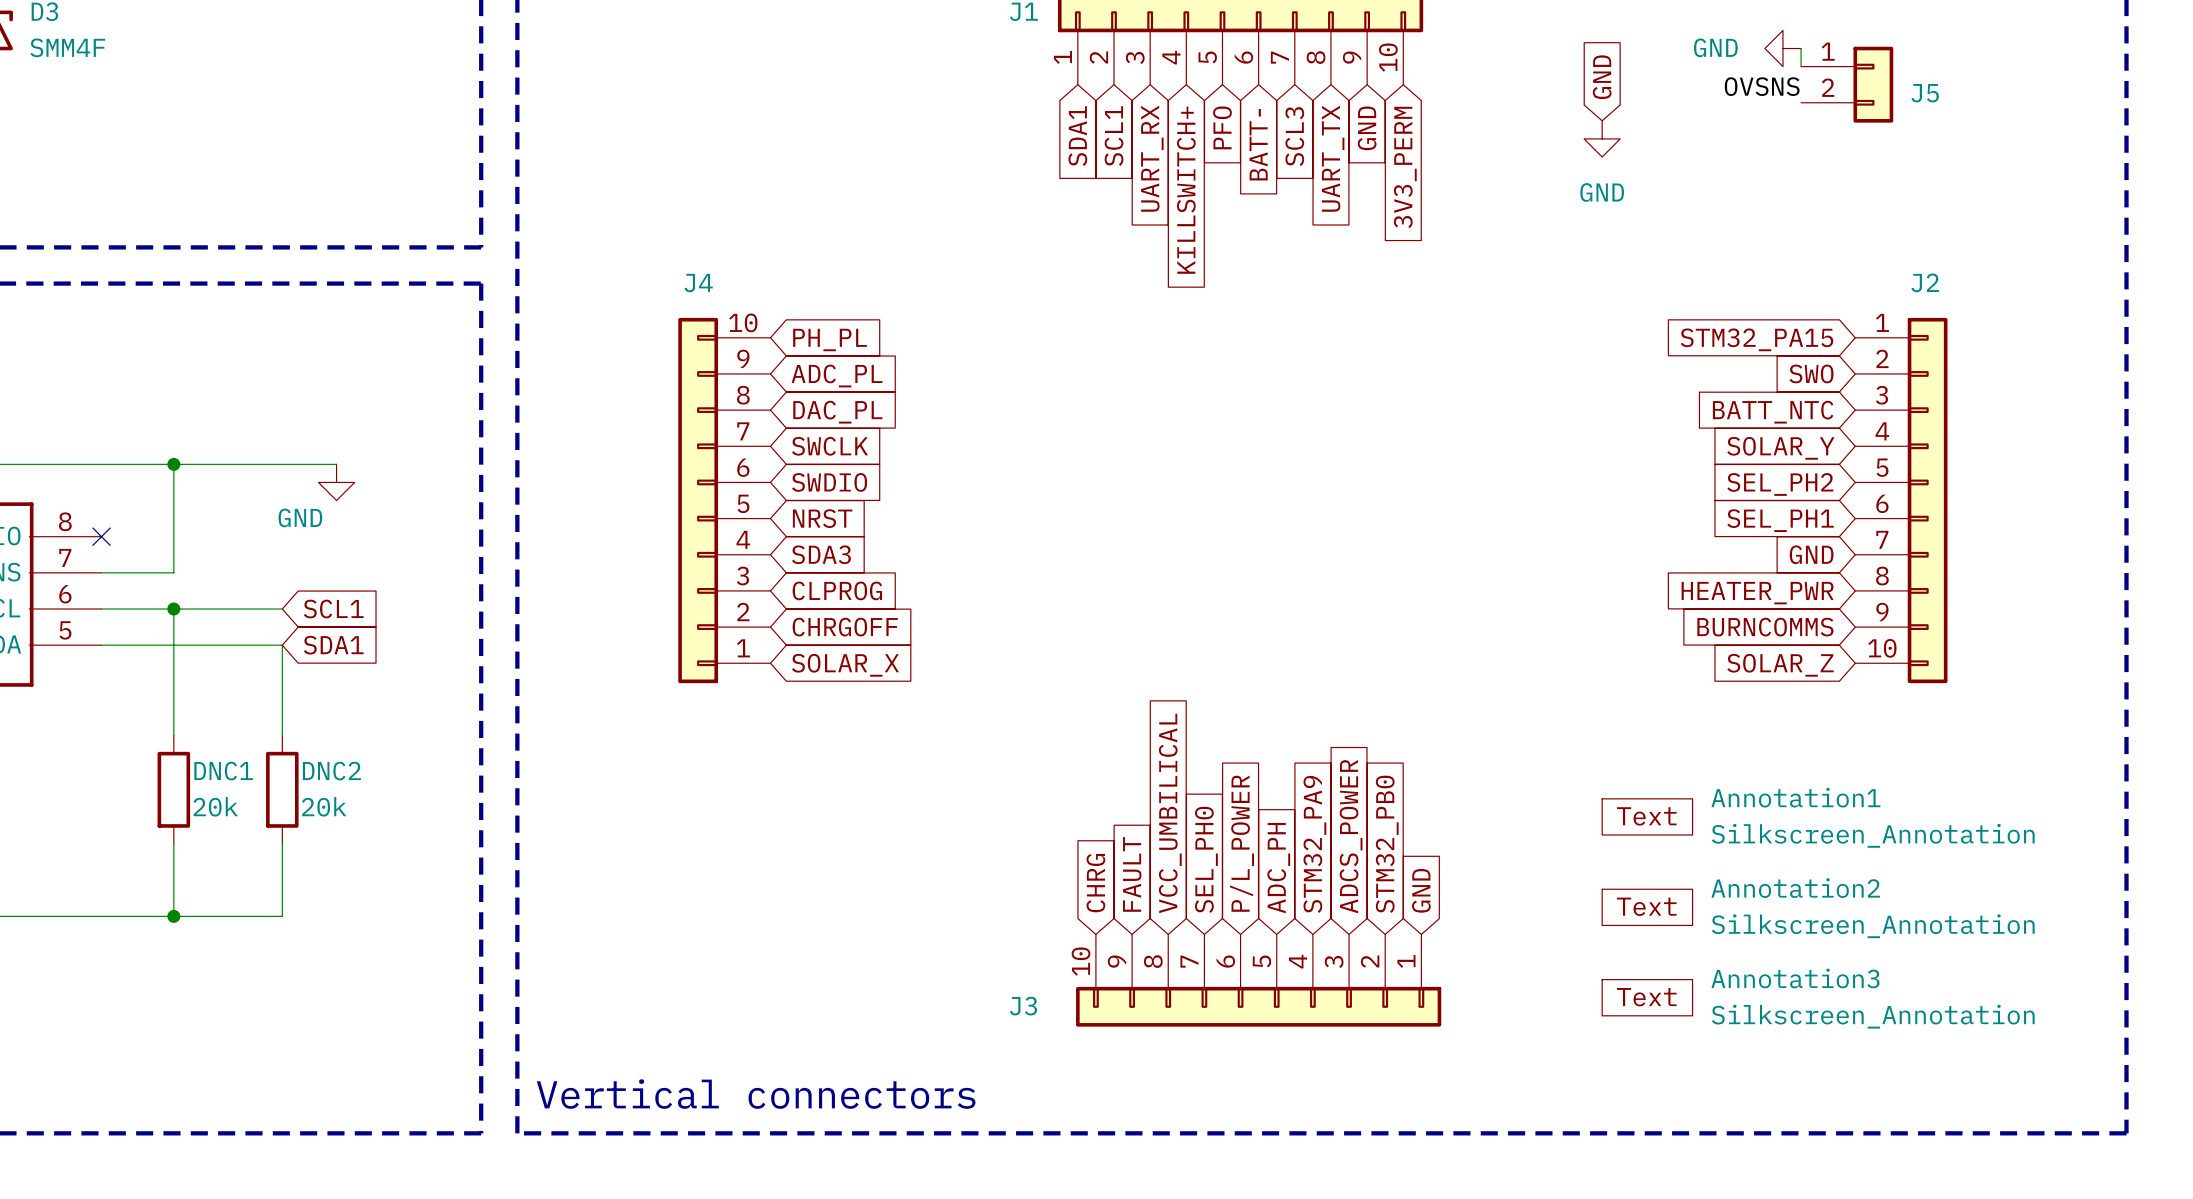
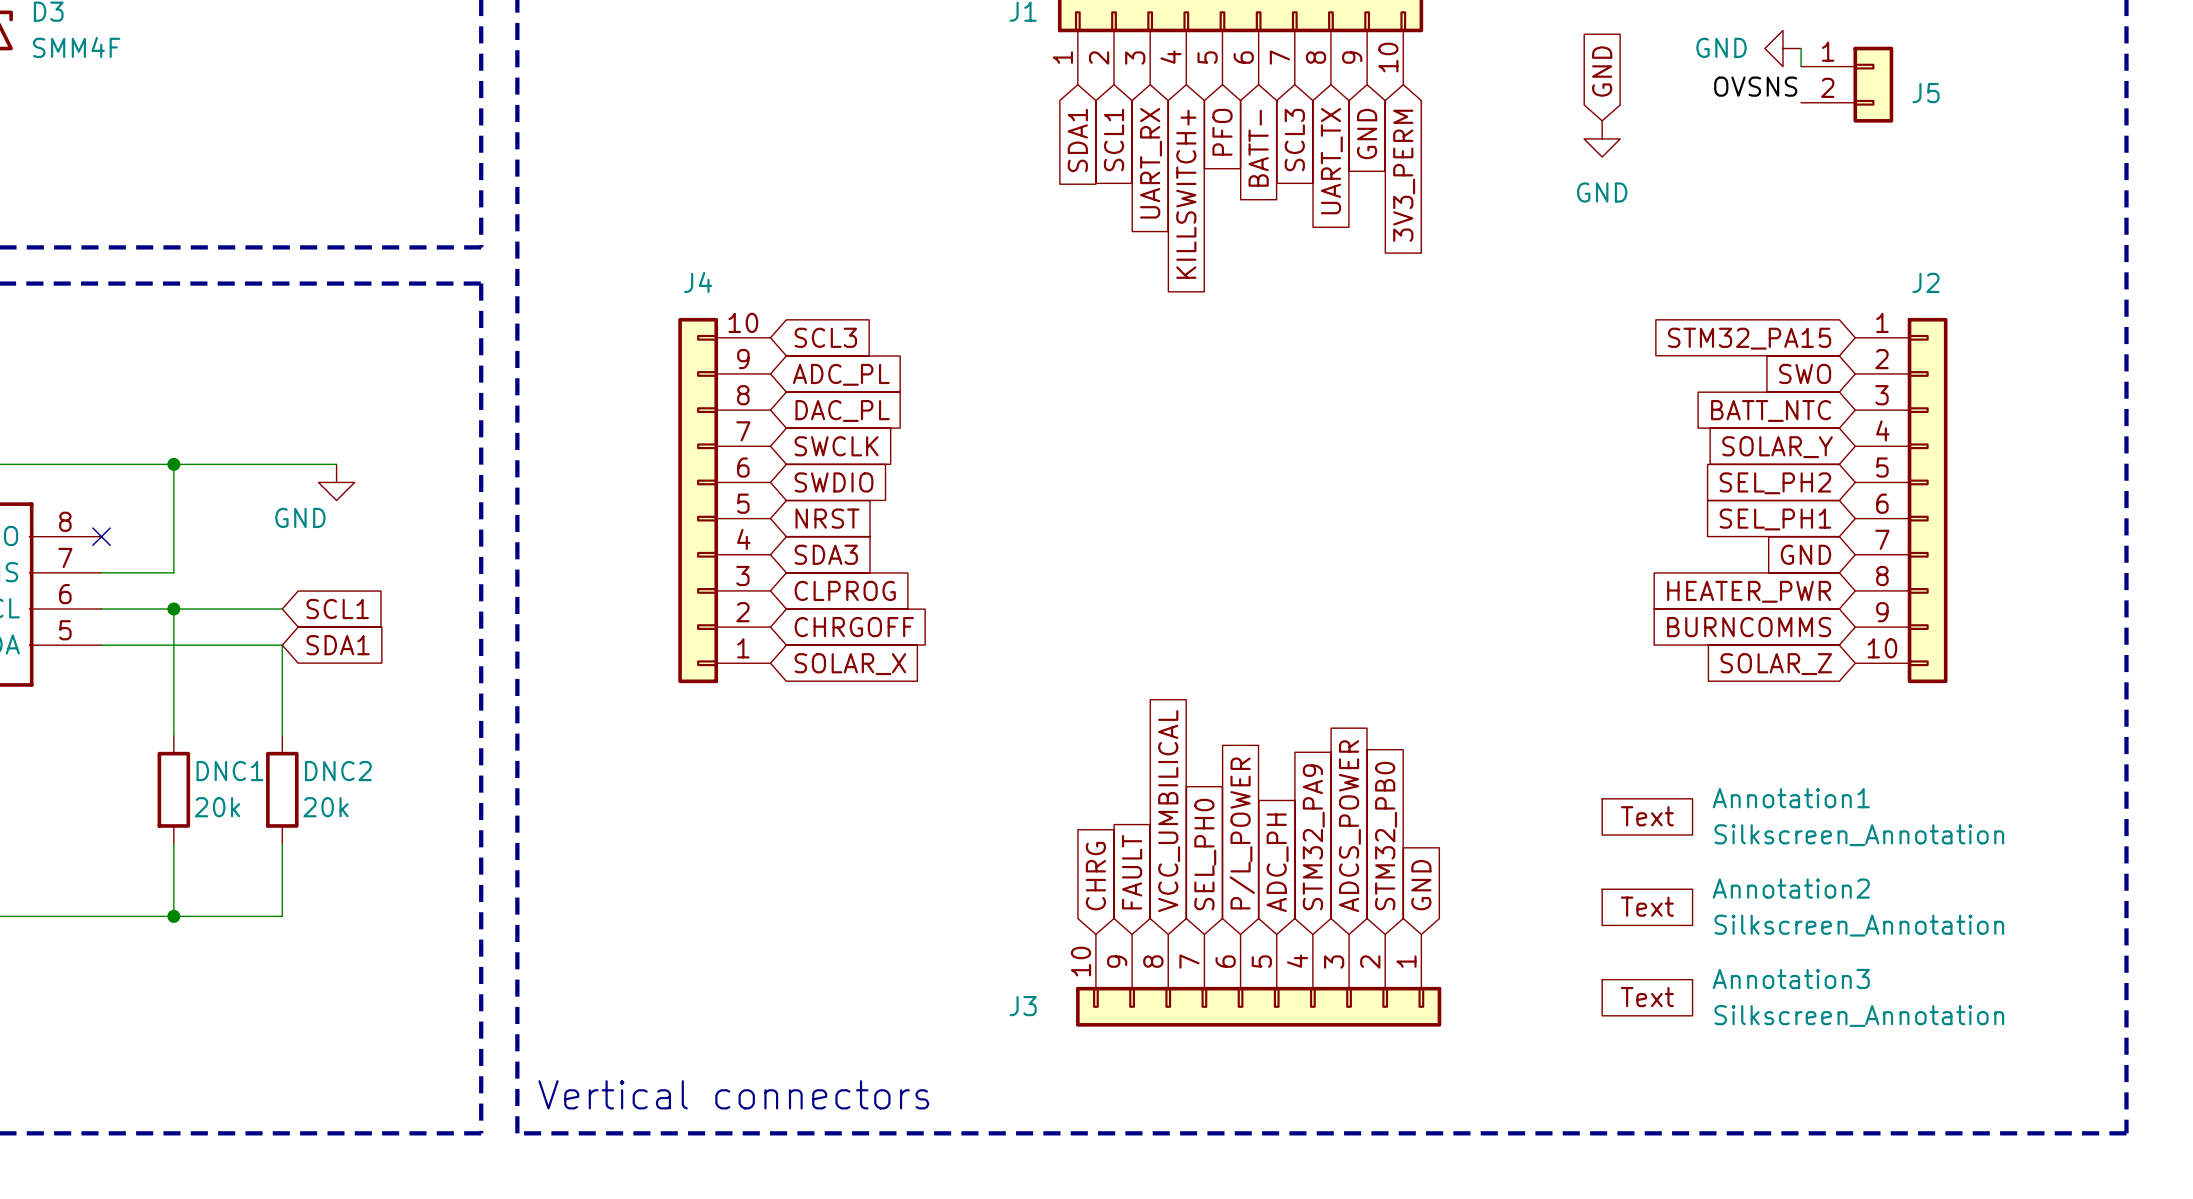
global label: PH_PL (830, 339) -> SCL3 (825, 337)

